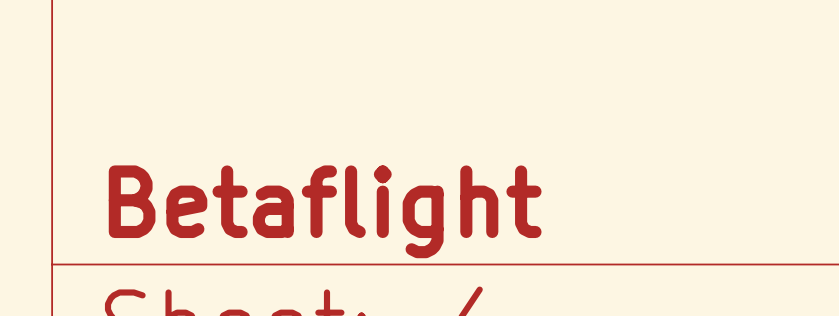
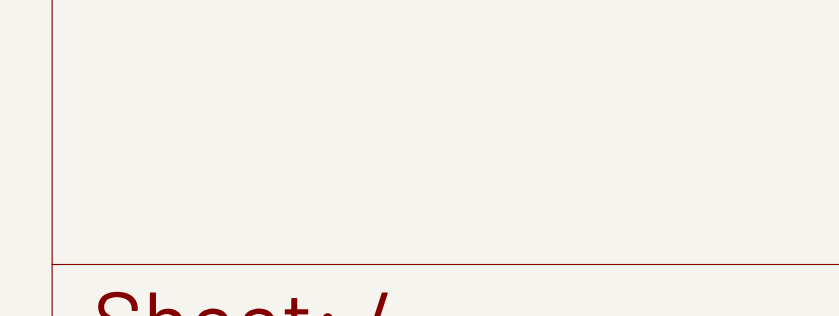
title block: Betaflight (325, 211) -> none

